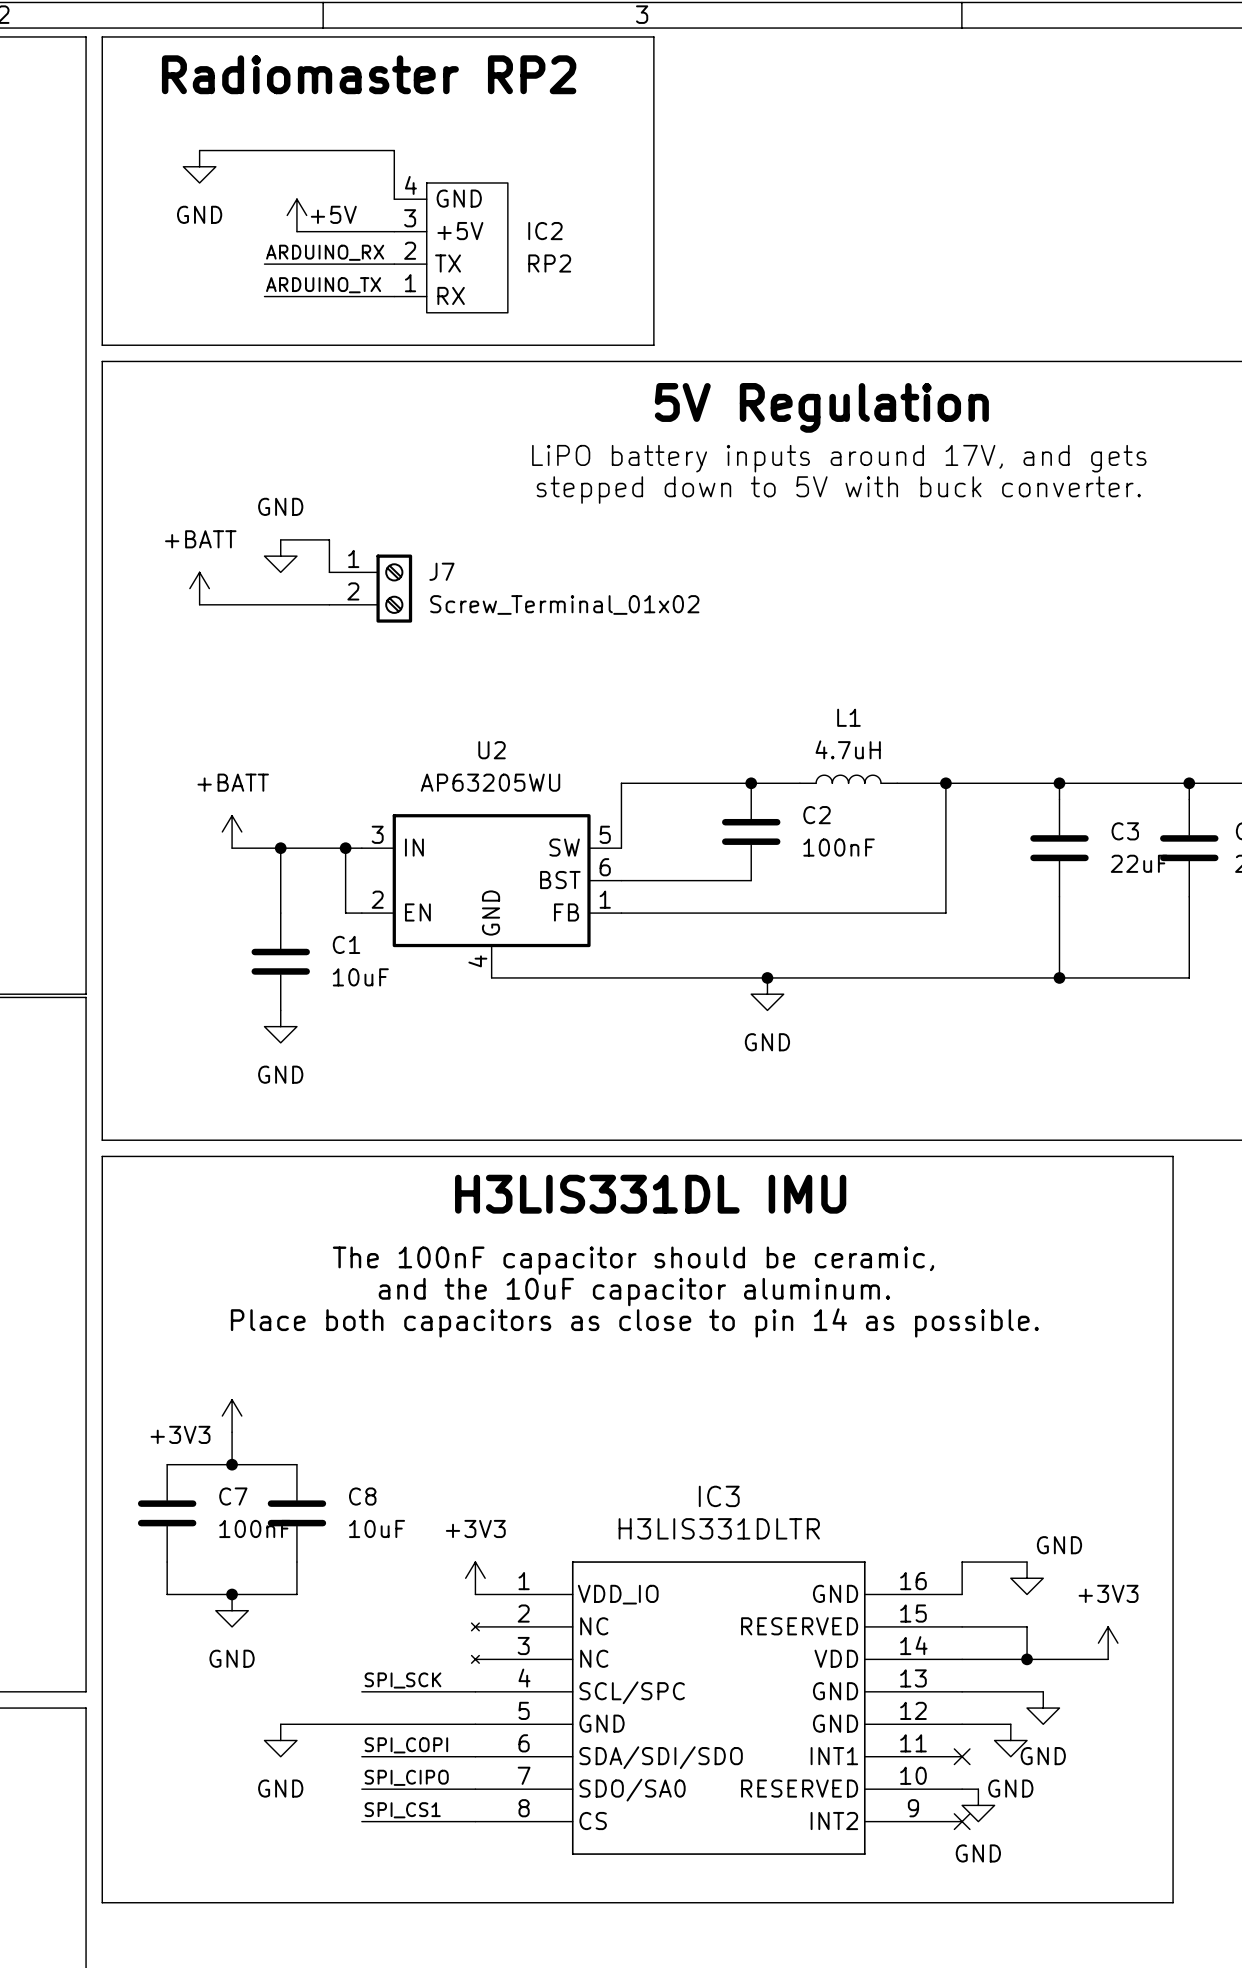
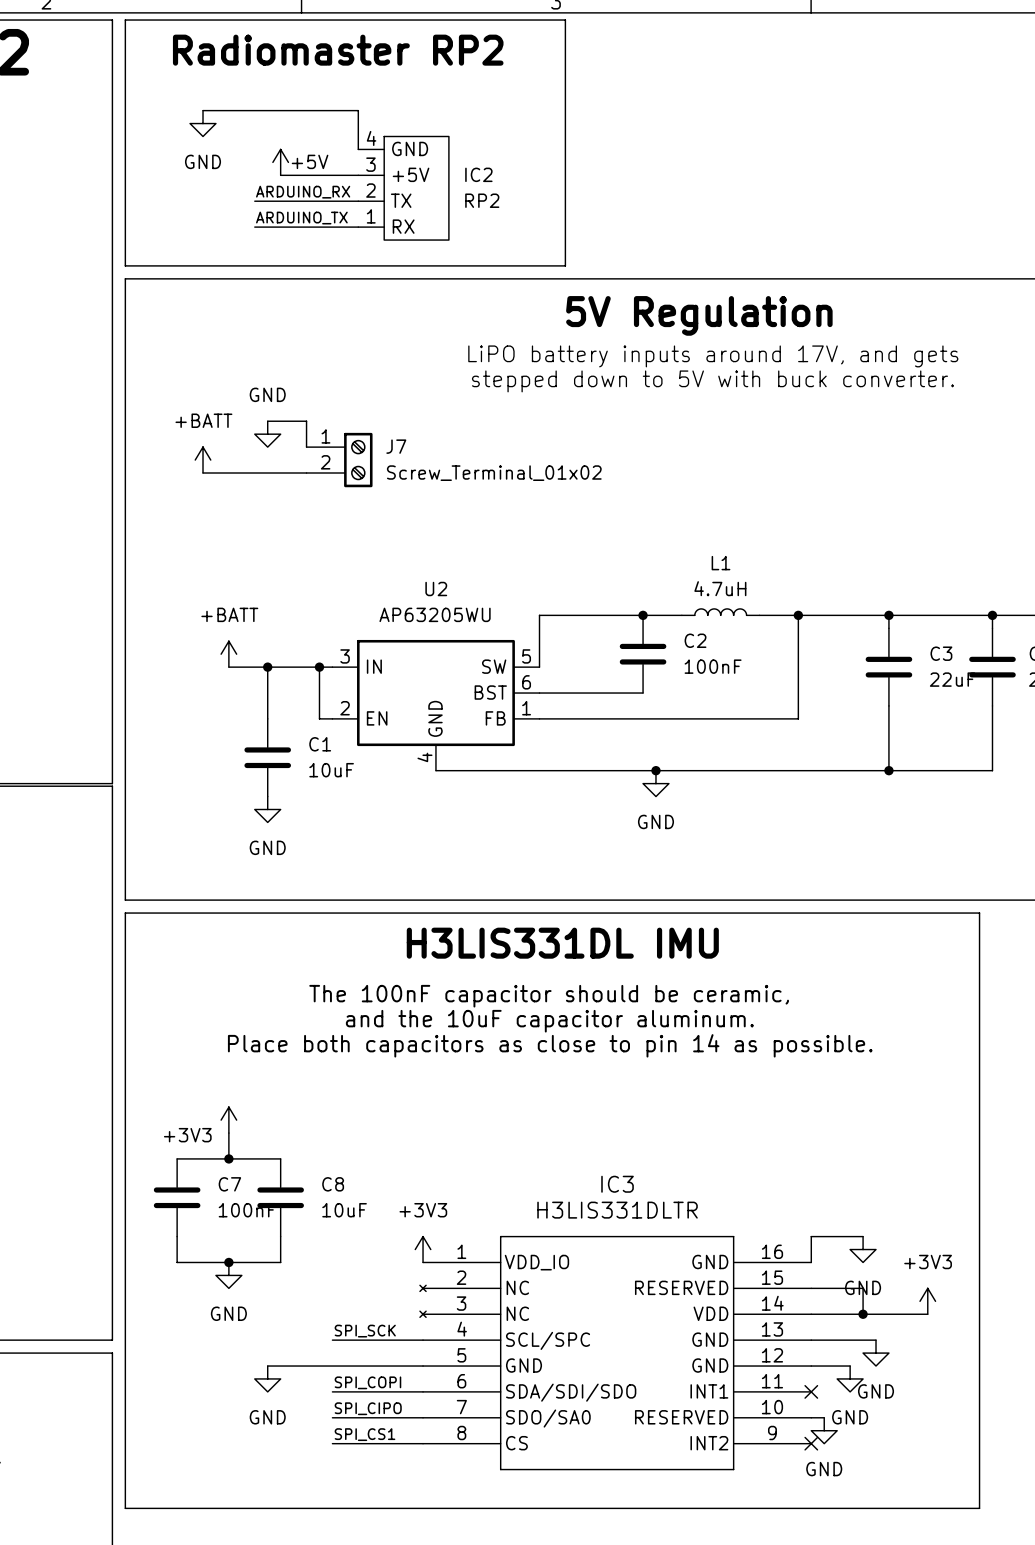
power symbol text position: GND (1059, 1545) -> GND (863, 1287)

